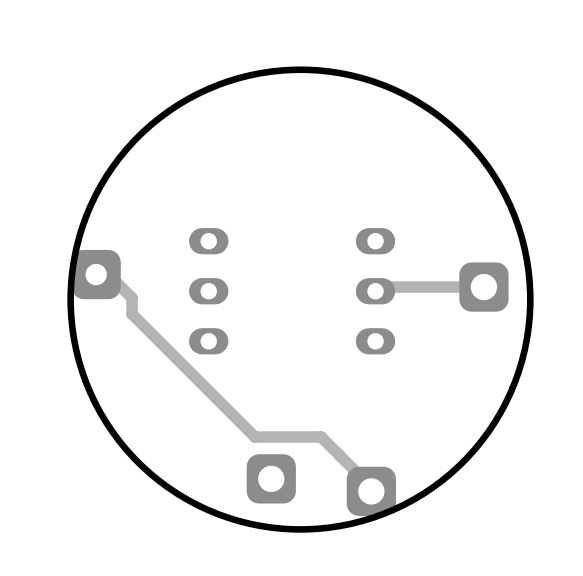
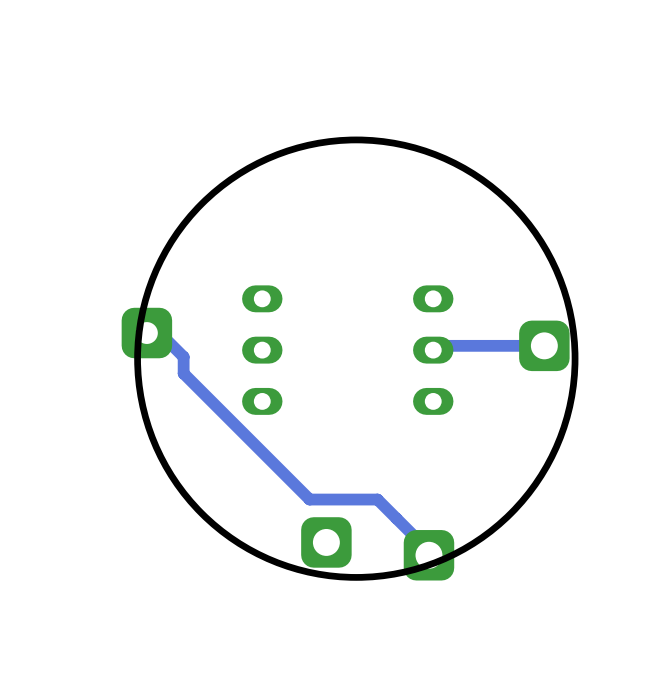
round board edge size: [67, 66, 534, 533] -> [134, 136, 579, 581]

